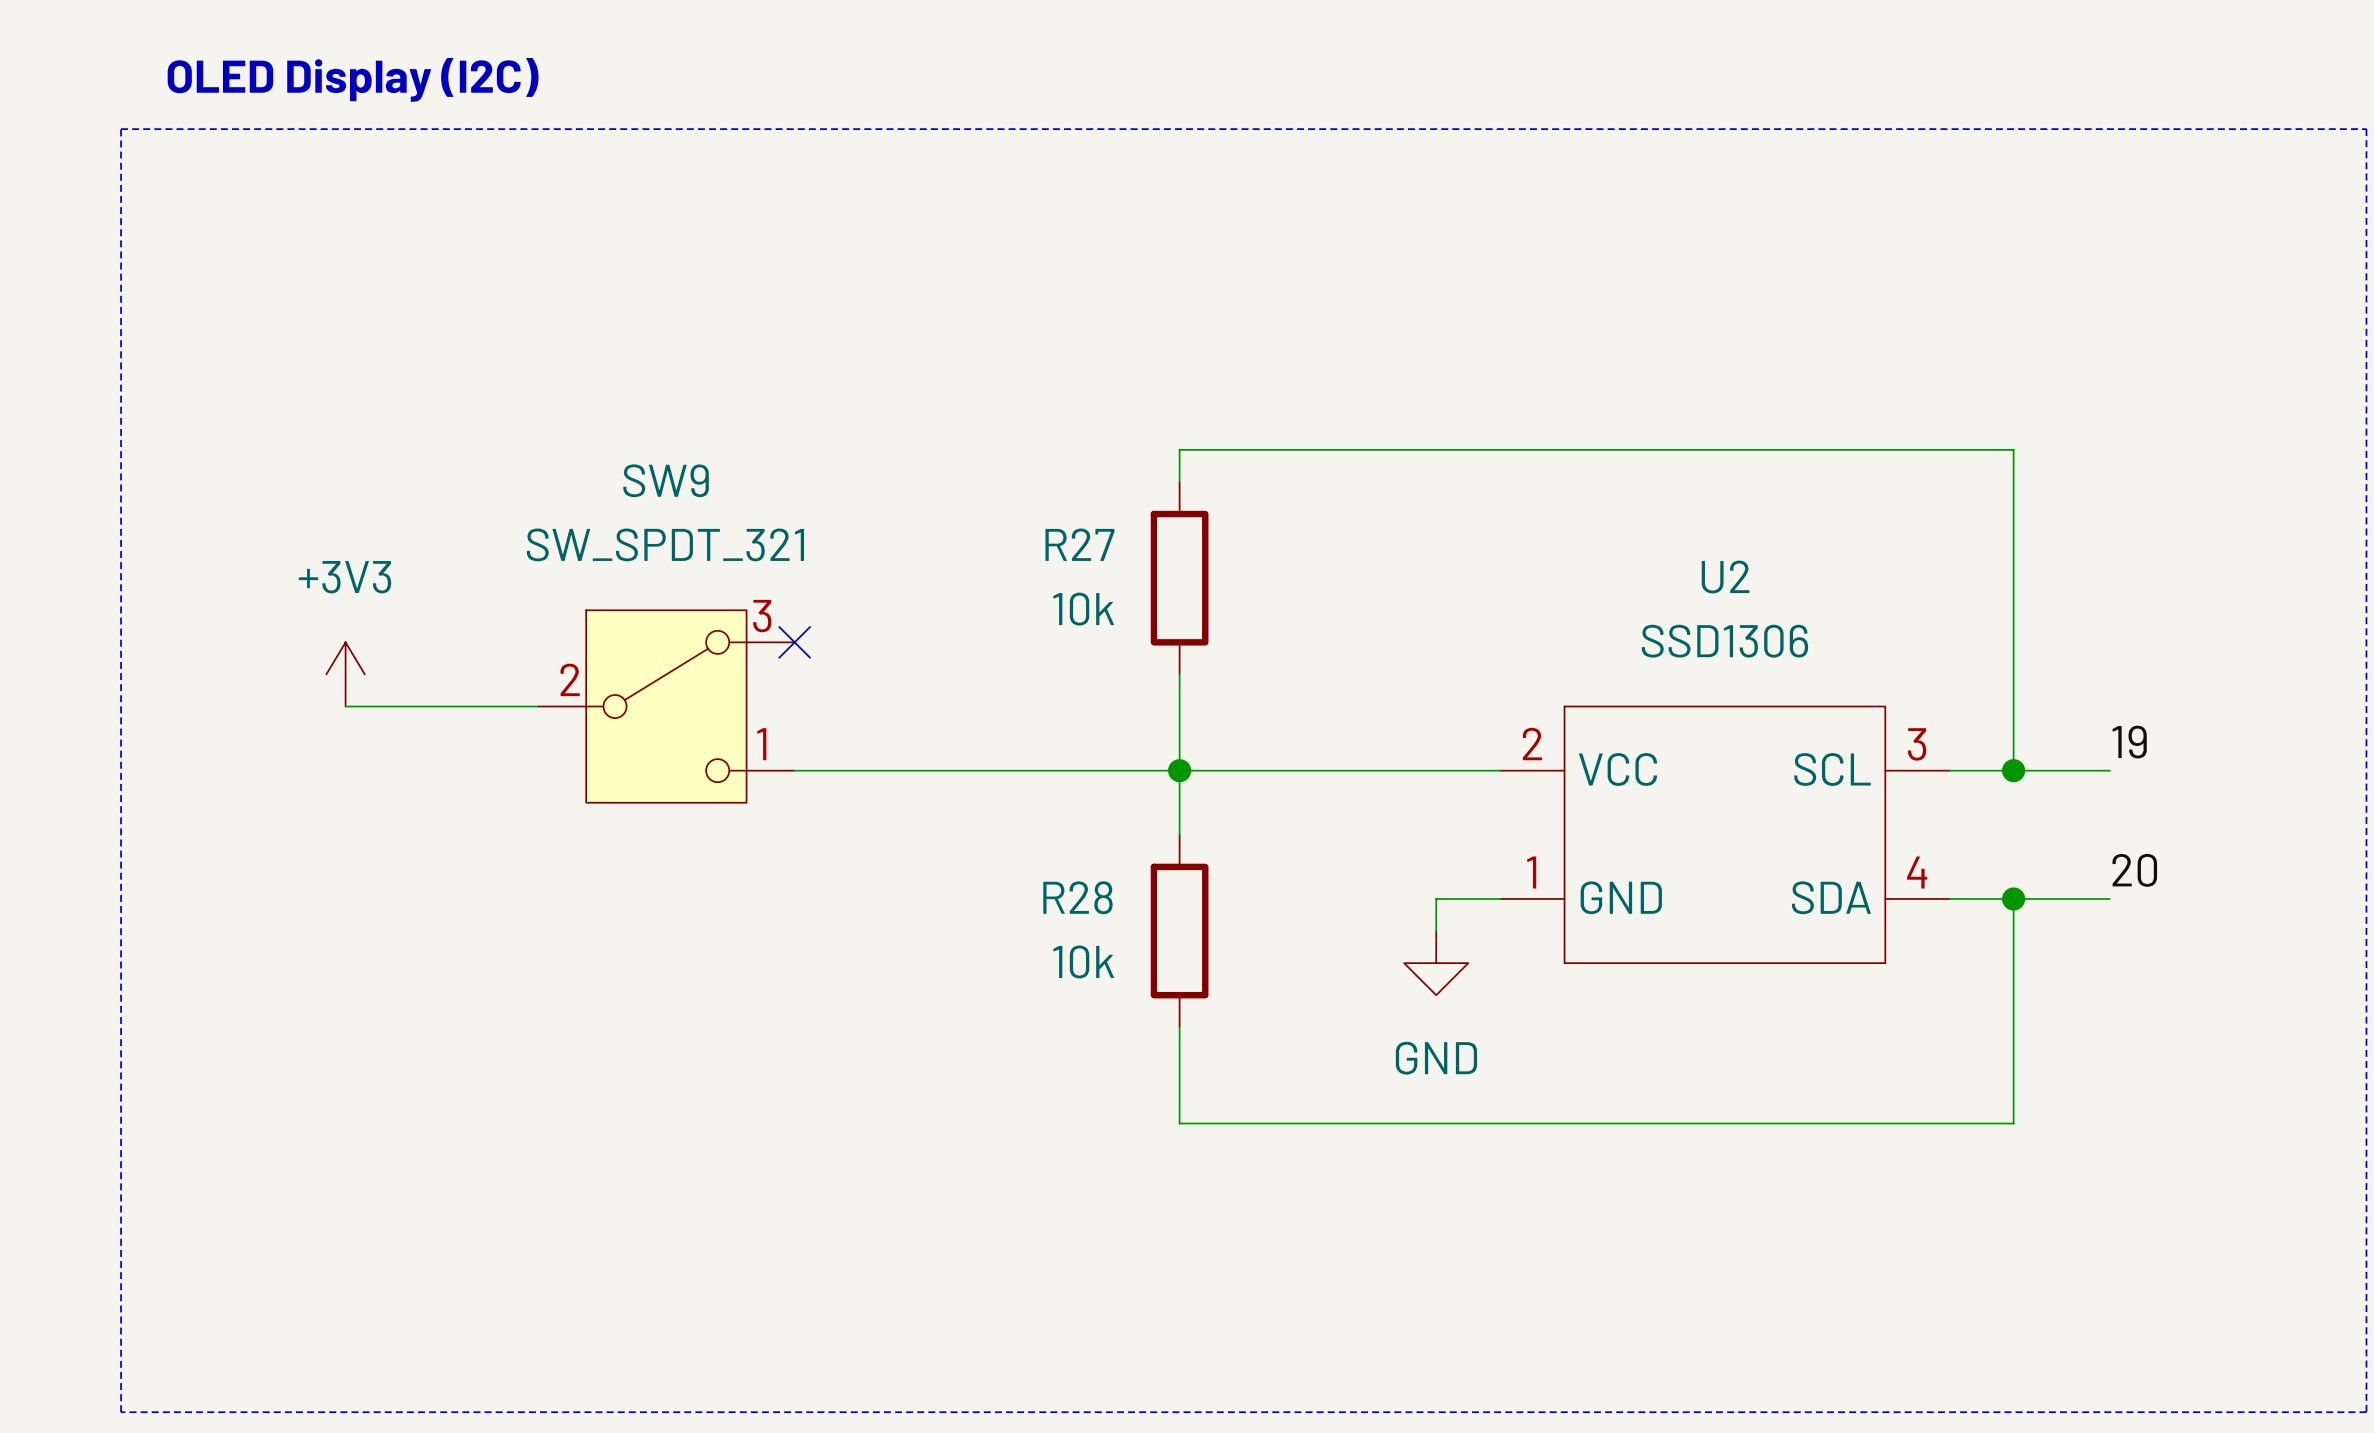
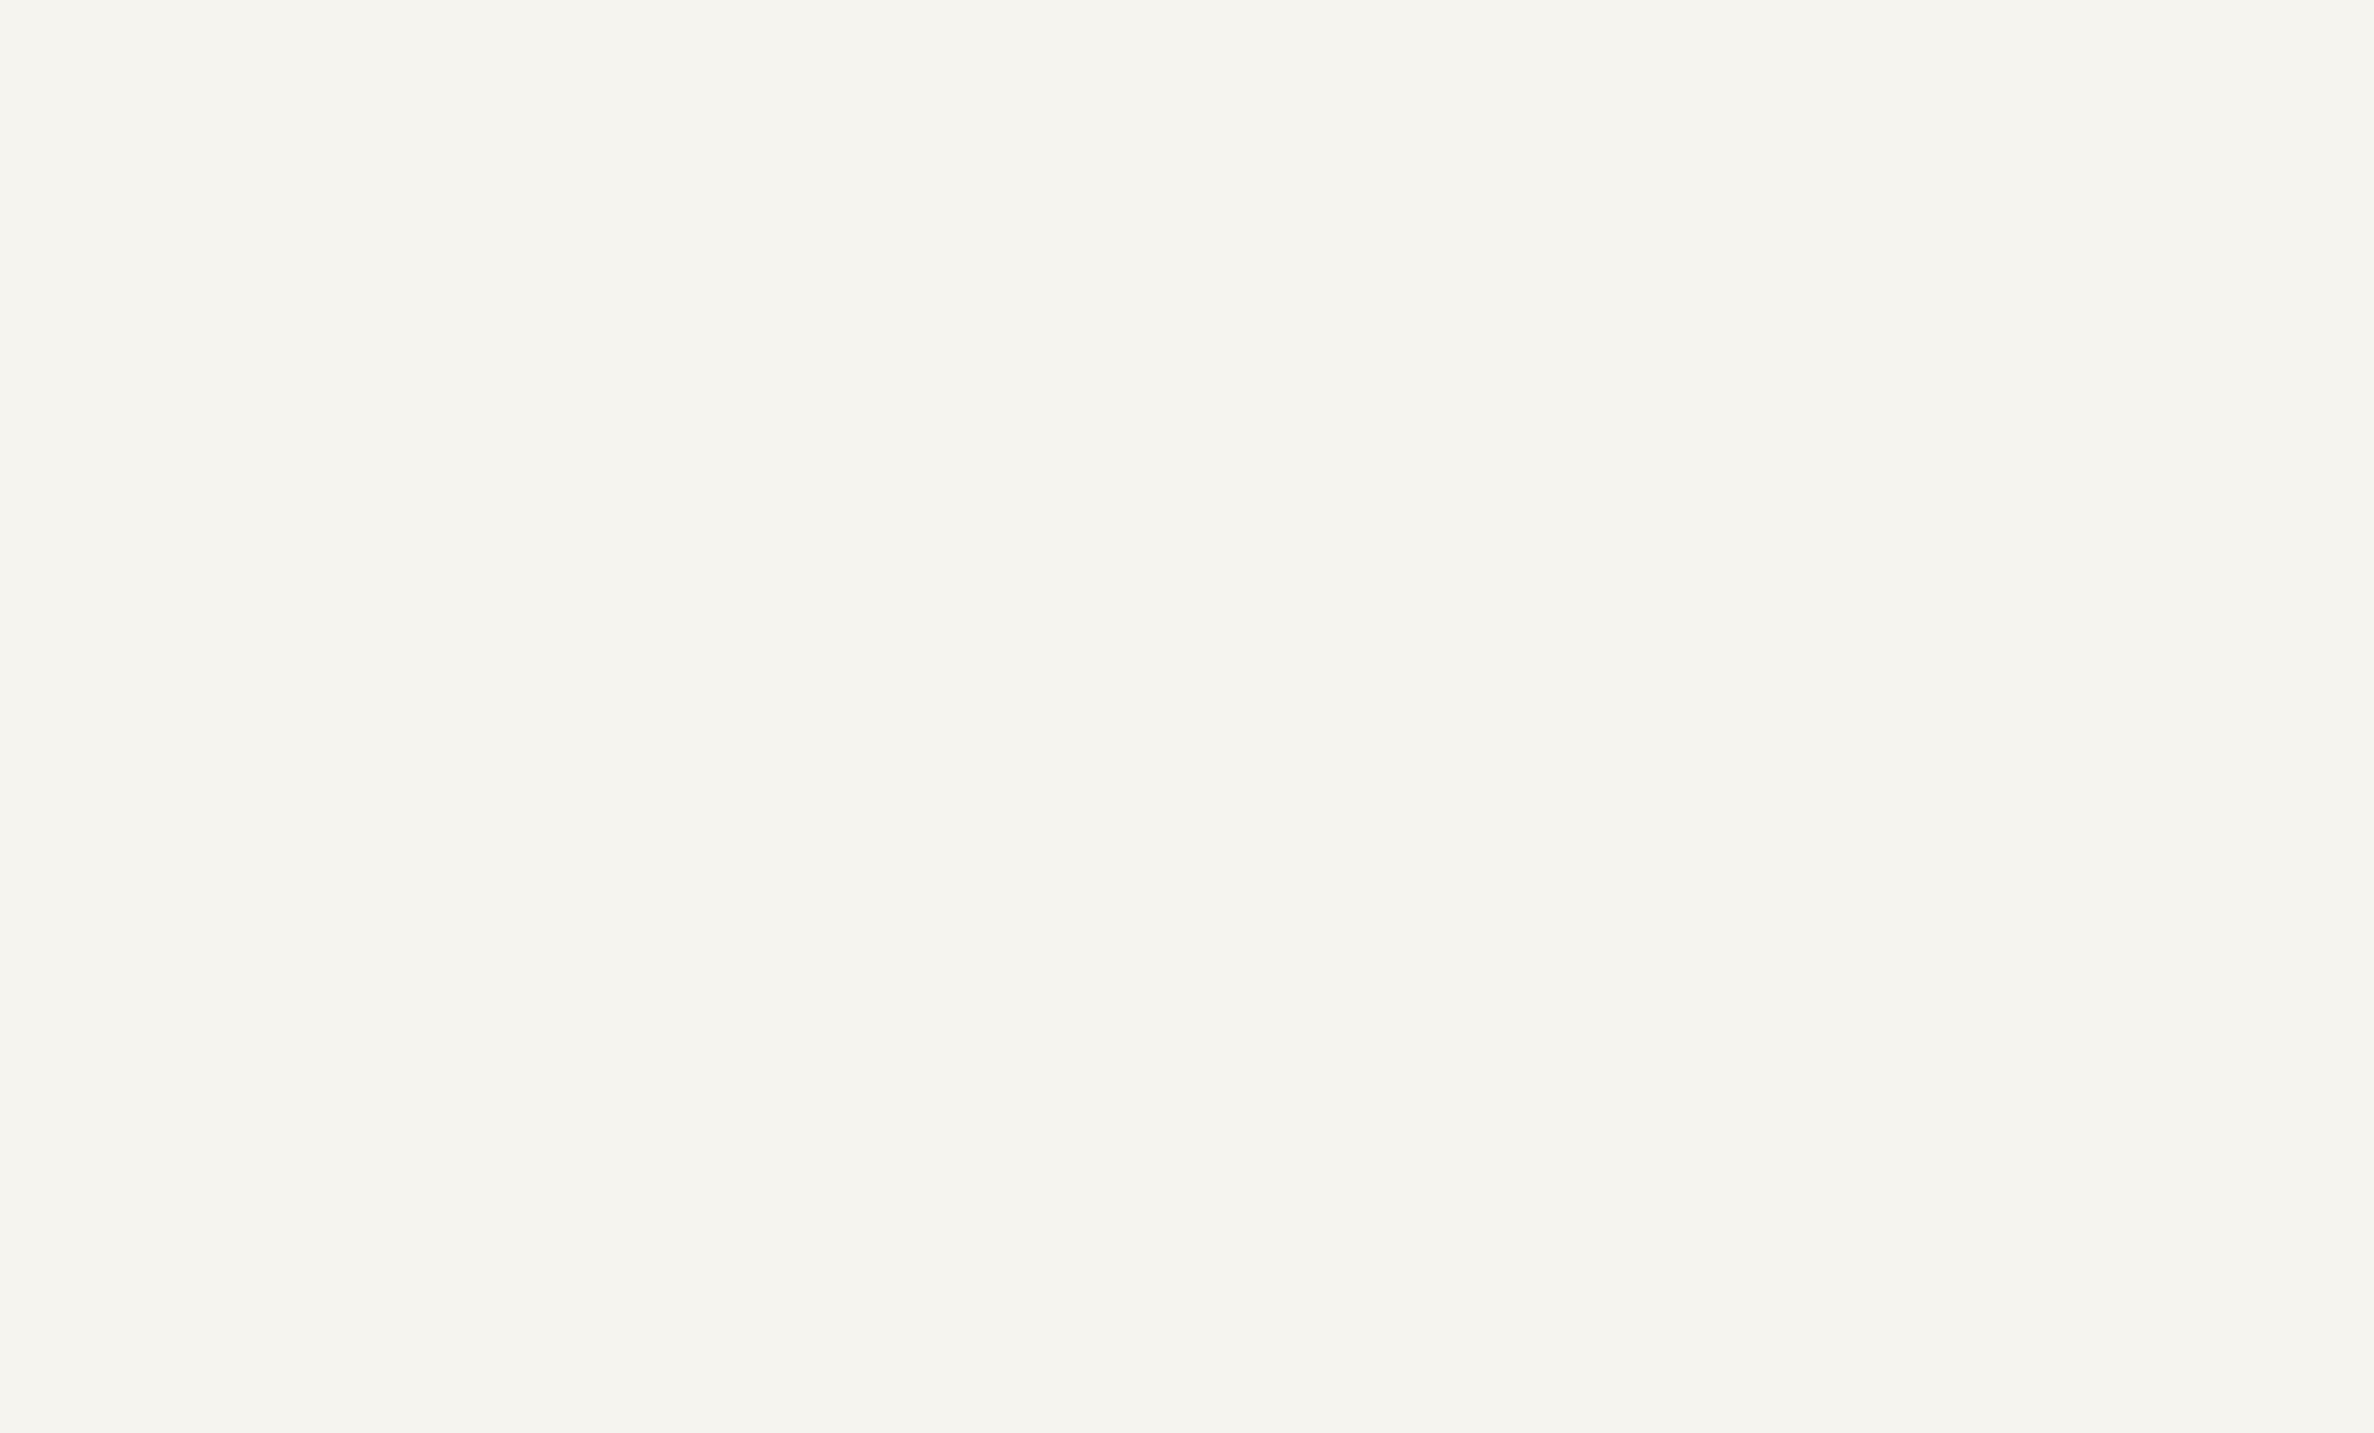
text: OLED Display (I2C) (353, 79) -> none
line: (121, 129) (2366, 129) (2366, 1412) (121, 1412) (121, 129) -> none
wire: (1179, 481) (1179, 449) (2013, 449) (2013, 770) -> none
R27: 10k (1179, 578) -> none
no-connect mark: (794, 642) -> none
power symbol: +3V3 (345, 674) -> none
wire: (1179, 674) (1179, 834) -> none
wire: (345, 706) (538, 706) -> none
SW9: SW_SPDT_321 (666, 706) -> none
label: 19 (2129, 742) -> none
wire: (794, 770) (1500, 770) -> none
junction: (1179, 770) -> none
wire: (1949, 770) (2109, 770) -> none
junction: (2013, 770) -> none
U2: SSD1306 (1724, 834) -> none
label: 20 (2134, 870) -> none
wire: (1500, 898) (1436, 898) (1436, 931) -> none
wire: (1949, 898) (2109, 898) -> none
wire: (2013, 898) (2013, 1123) (1179, 1123) (1179, 1027) -> none
junction: (2013, 898) -> none
R28: 10k (1179, 931) -> none
power symbol: GND (1436, 963) -> none

